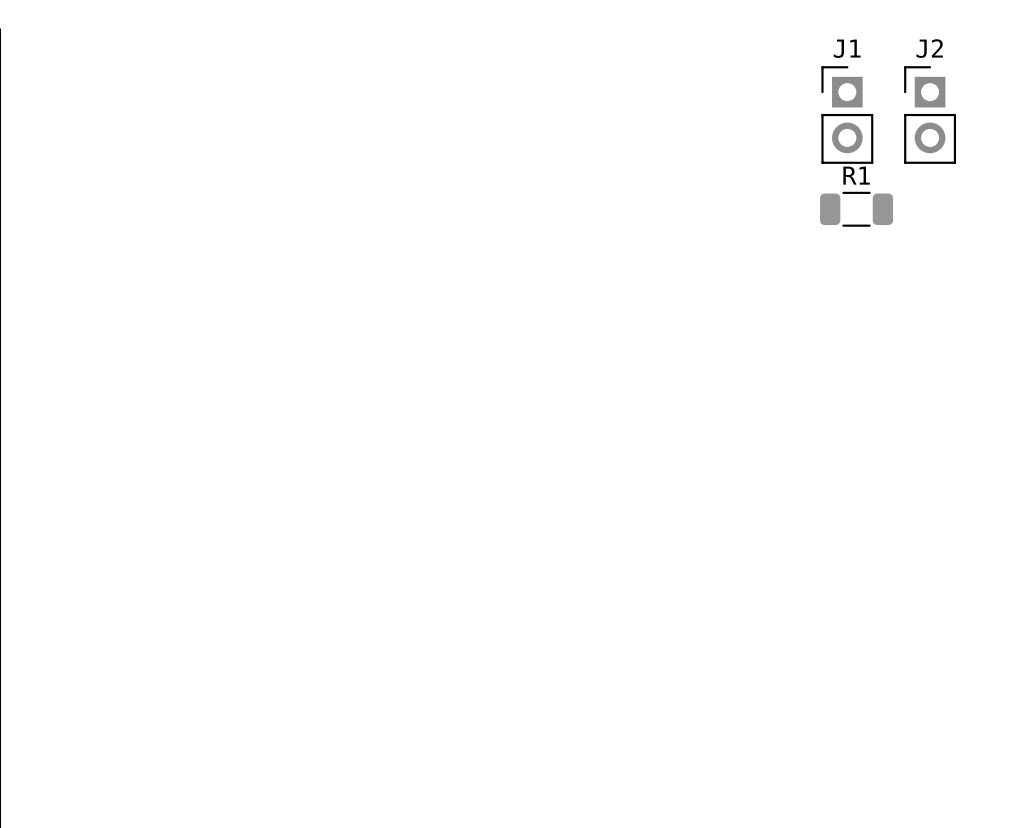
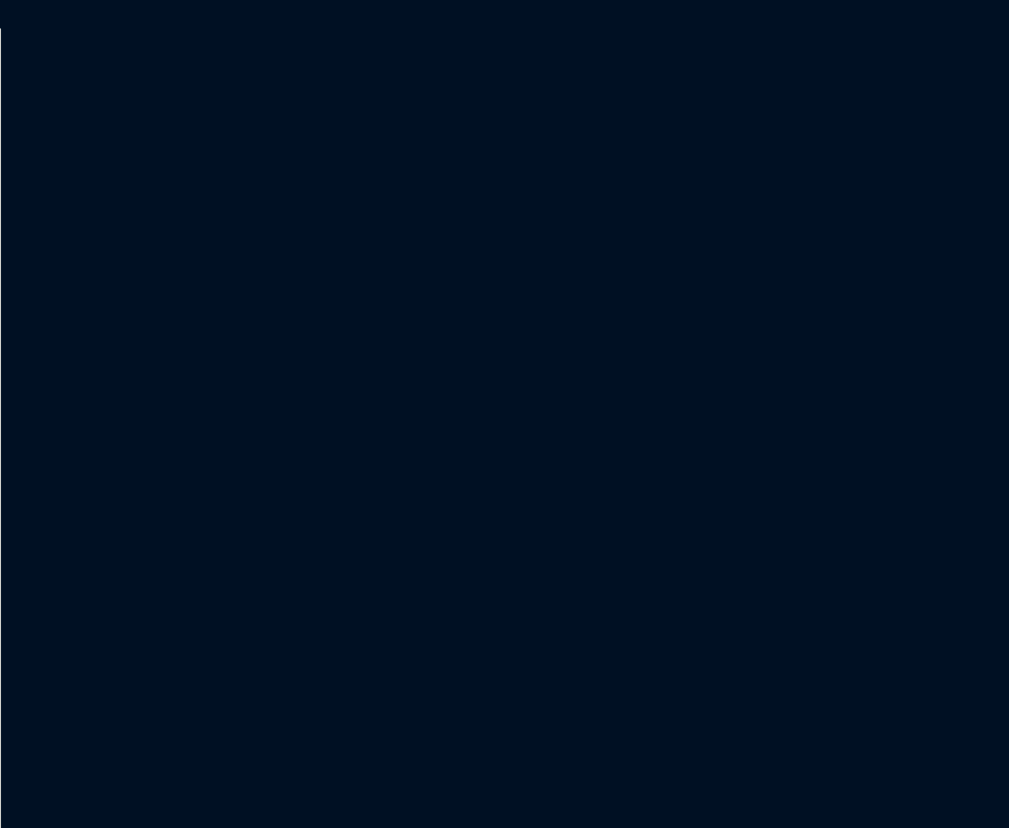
J1: (847, 115) -> none
J2: (930, 115) -> none
R1: (856, 209) -> none

